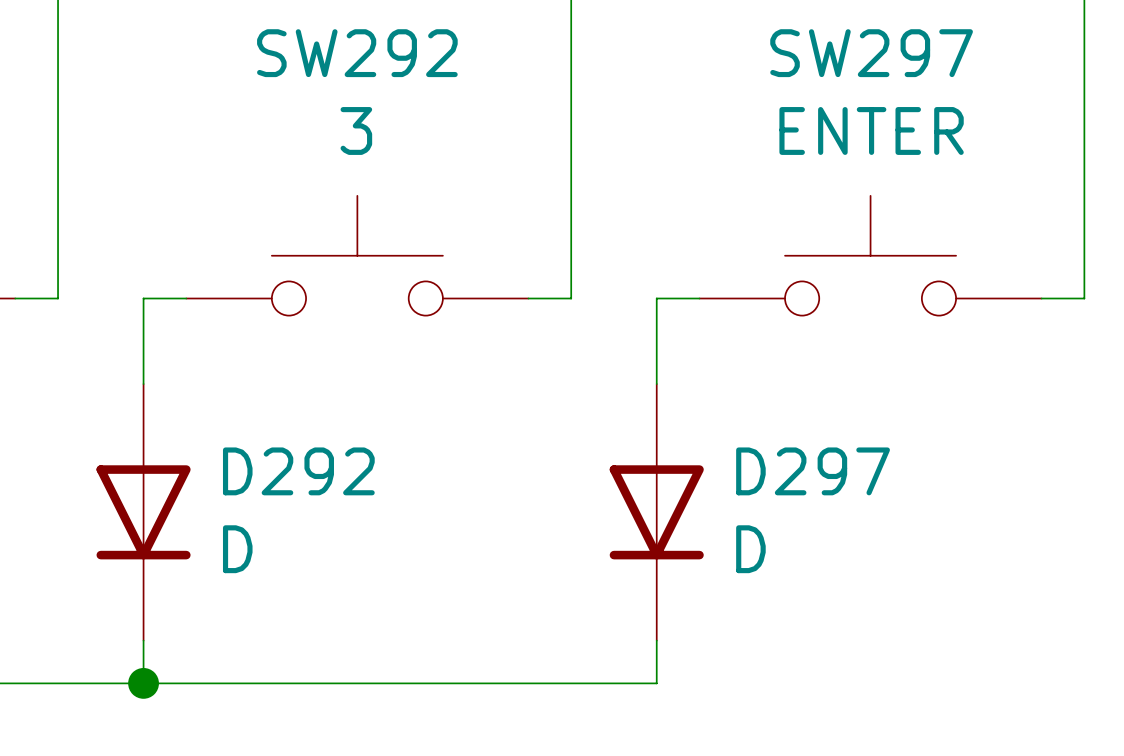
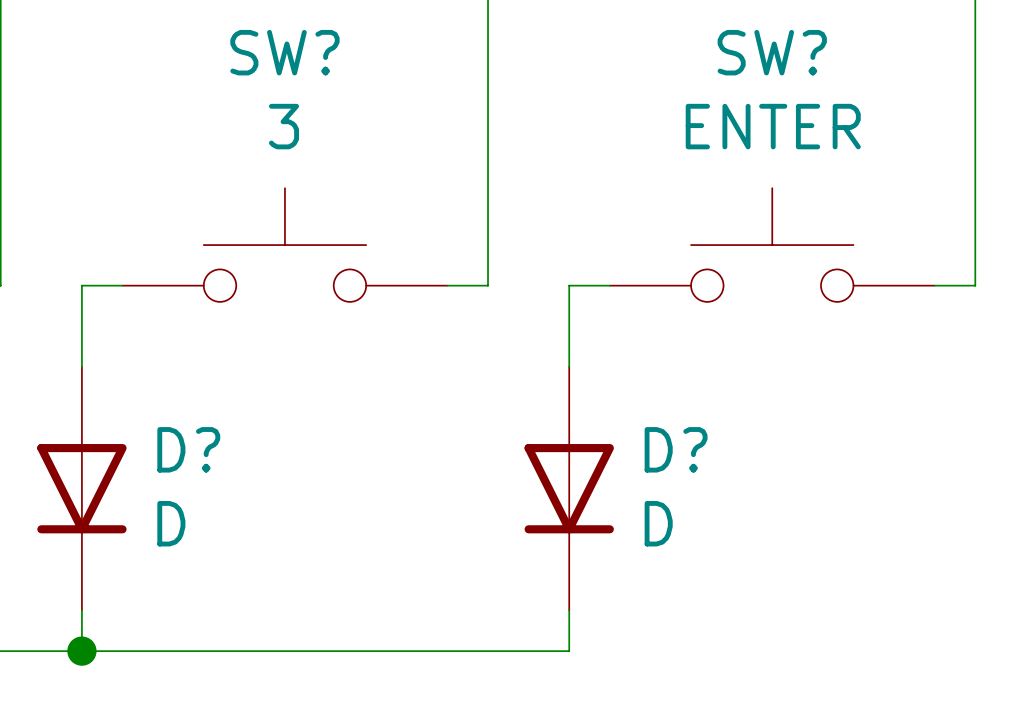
SW292 name: SW292 (357, 53) -> SW? (284, 52)
SW297 name: SW297 (871, 53) -> SW? (772, 52)
D292 name: D292 (298, 471) -> D? (188, 449)
D297 name: D297 (813, 471) -> D? (676, 449)

